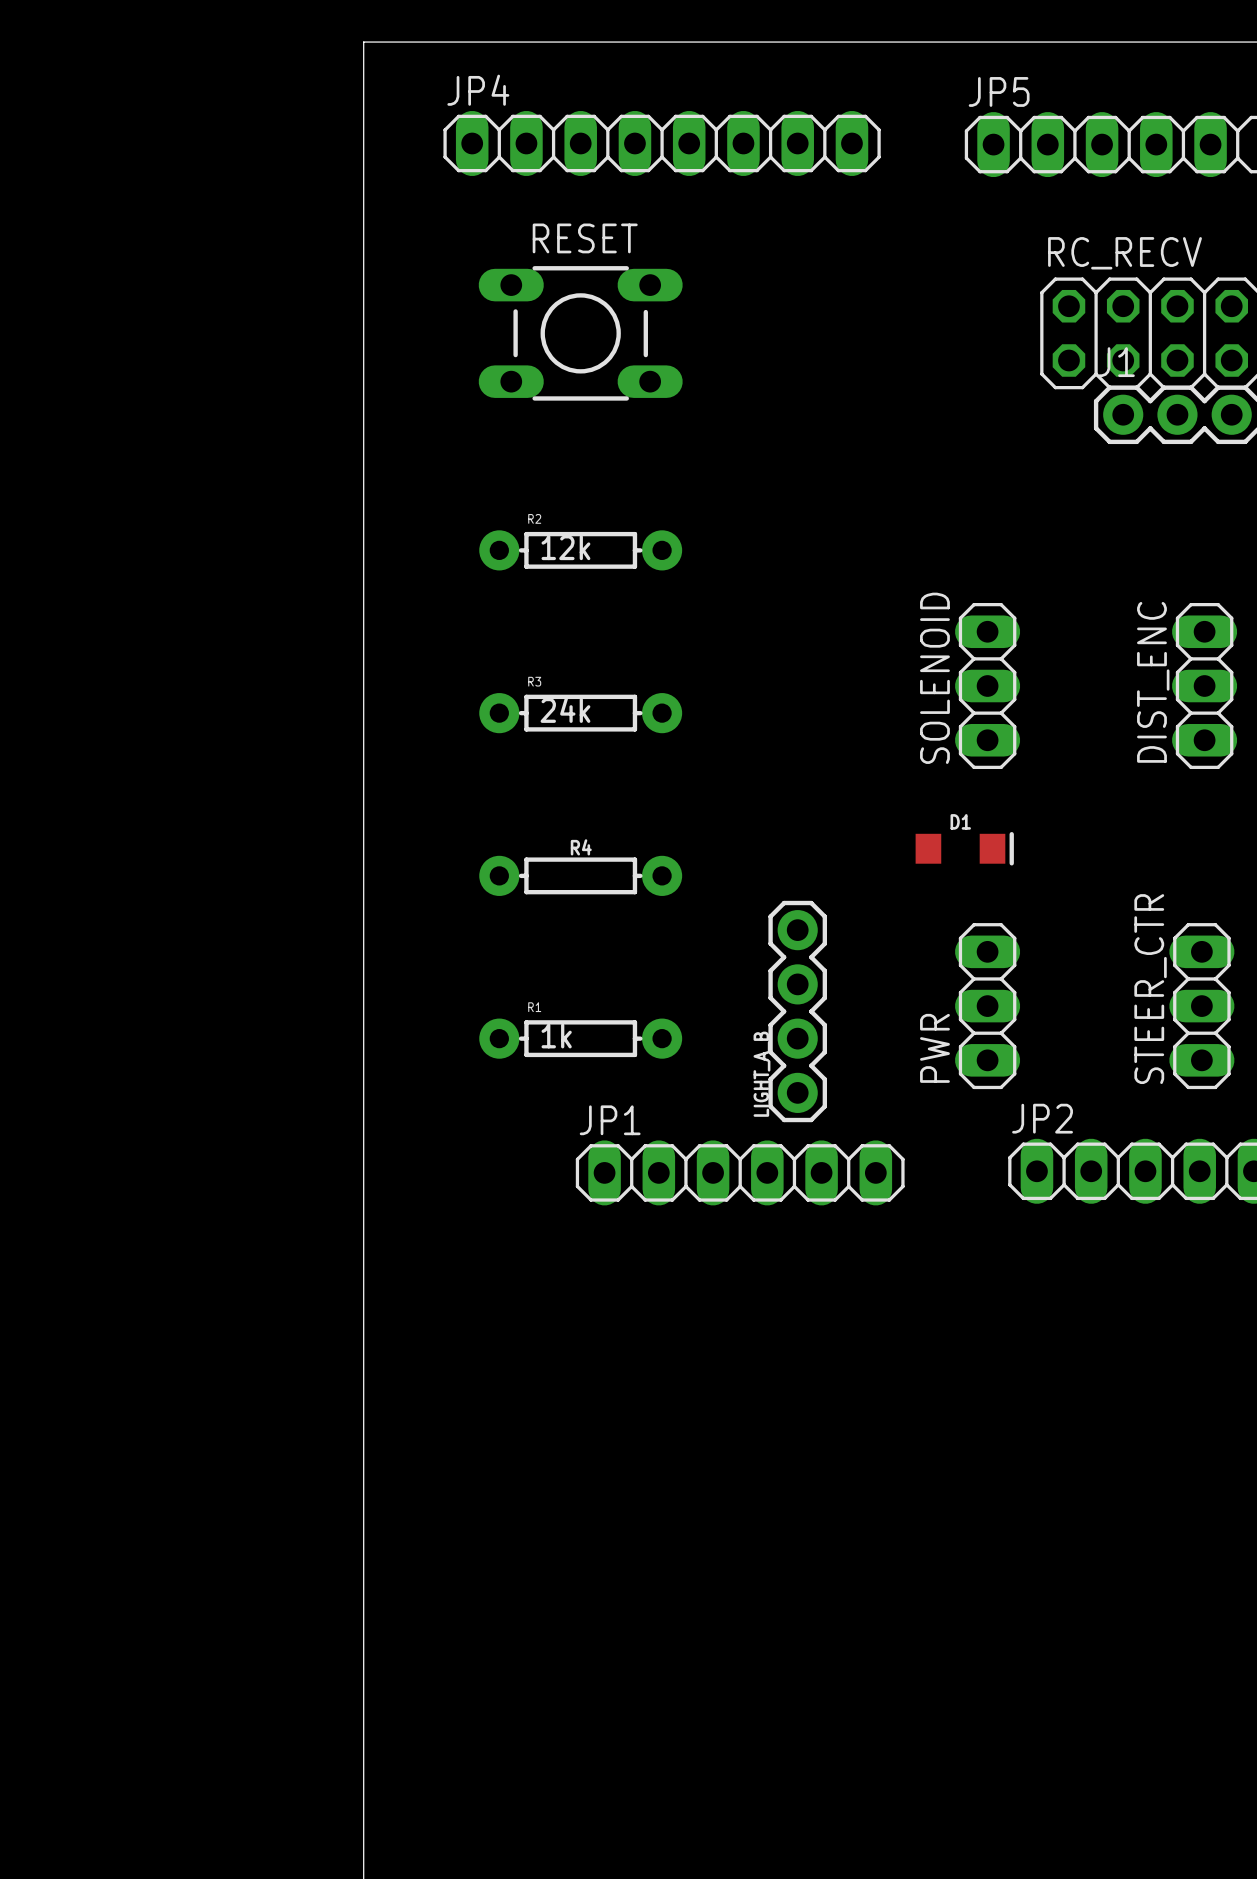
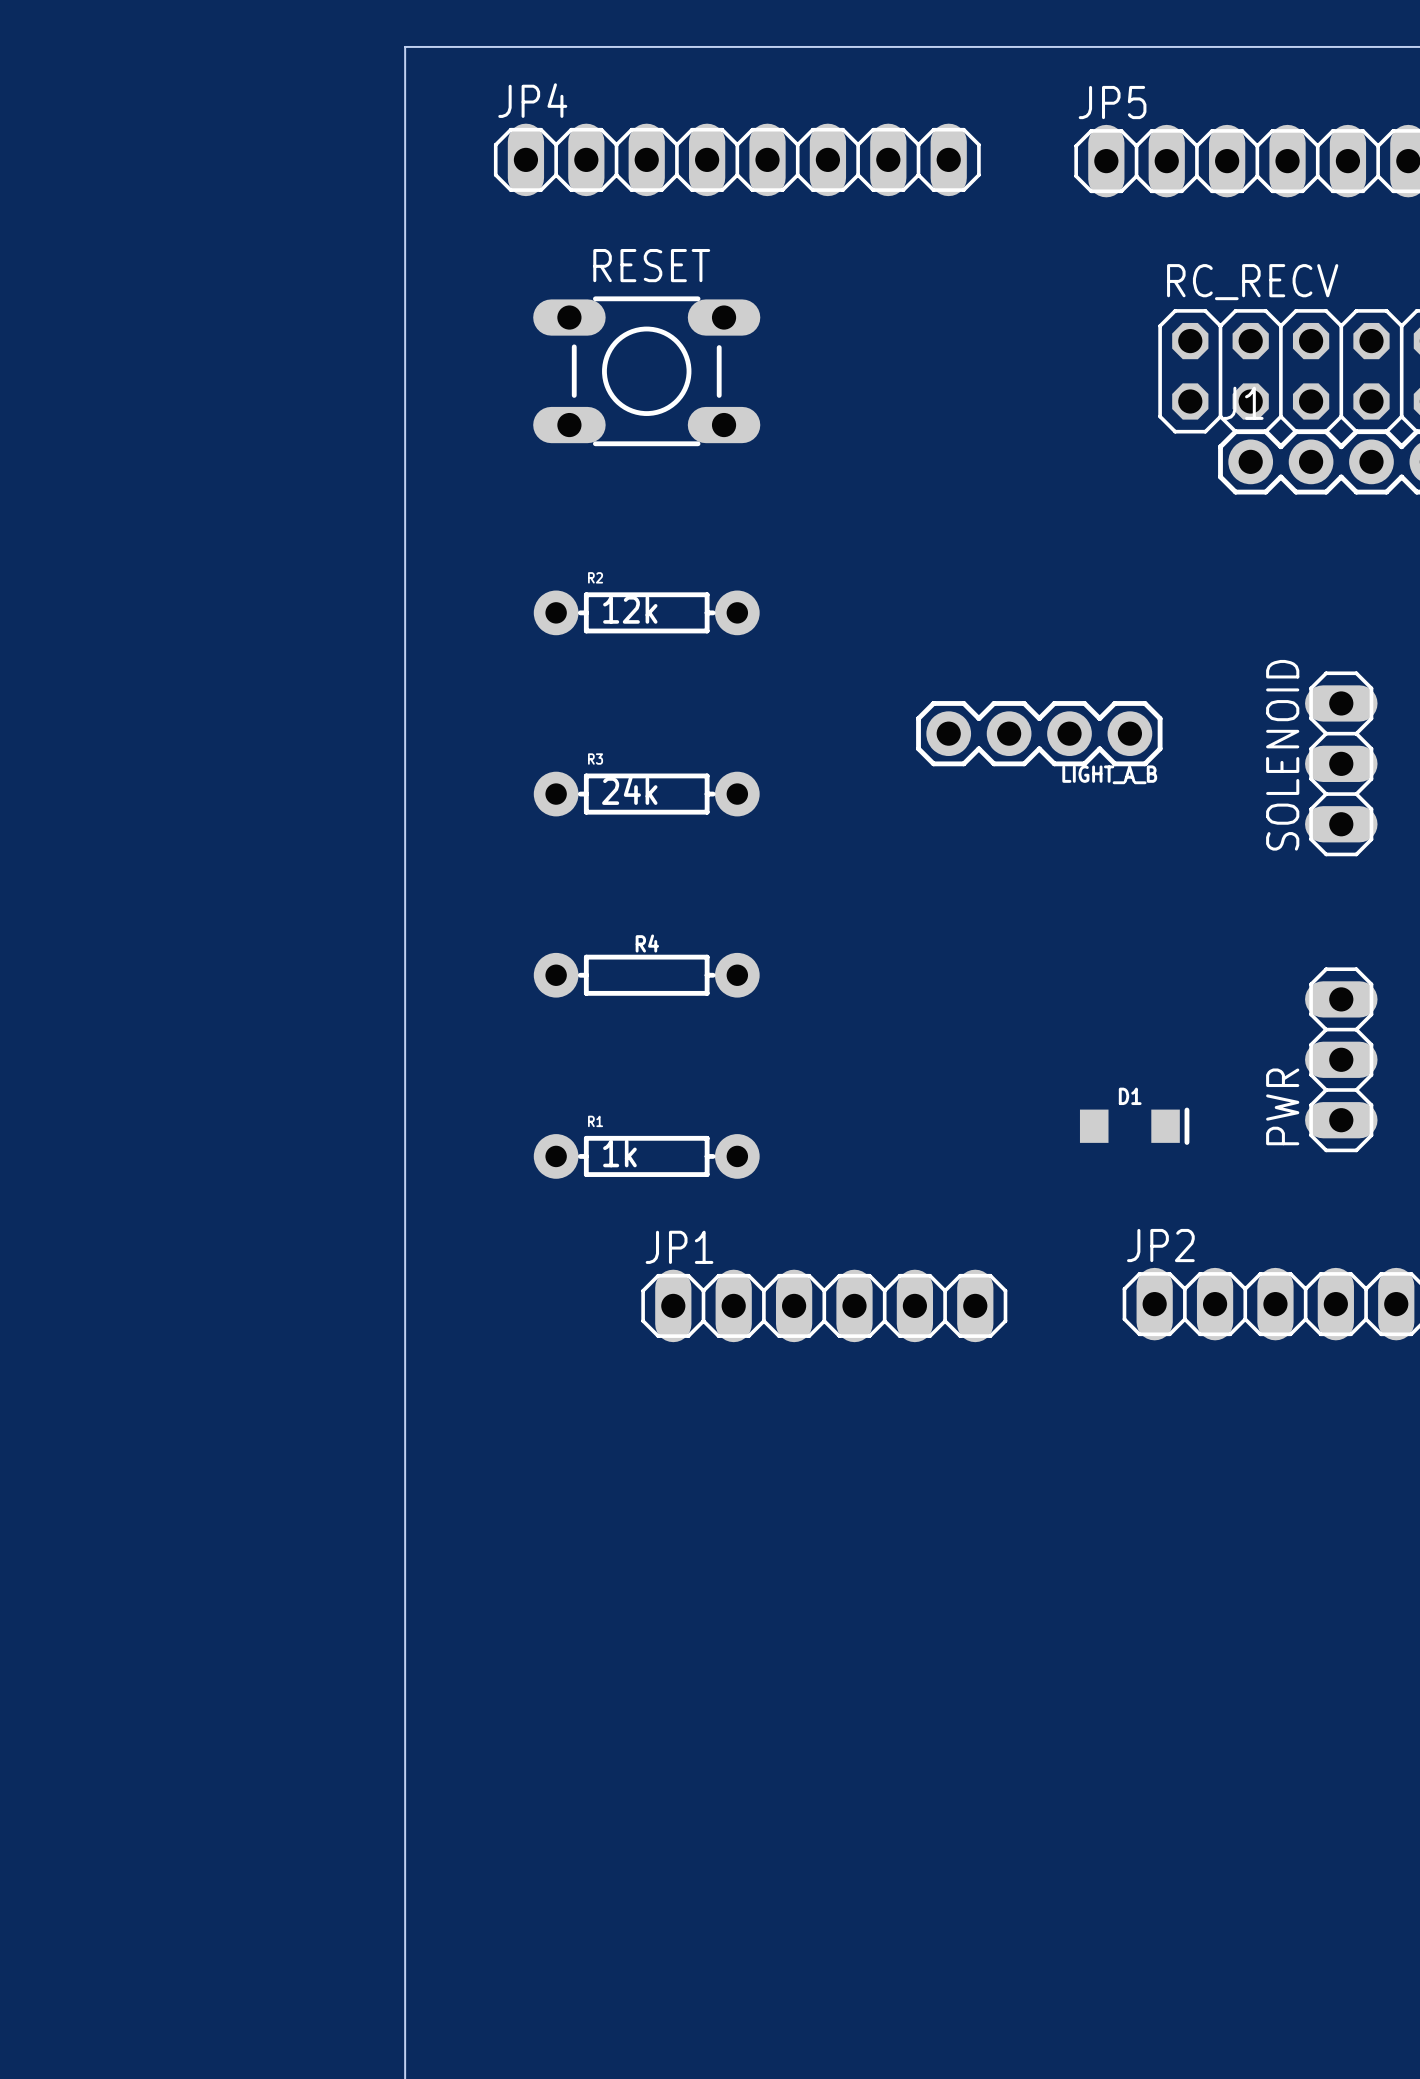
DIST_ENC name: DIST_ENC (1153, 682) -> SOLENOID (1282, 755)
SOLENOID: (987, 686) -> none
D1 position: (964, 848) -> (1134, 1126)
PWR position: (987, 1006) -> (1341, 1059)
STEER_CTR: (1201, 1006) -> none
LIGHT_A_B rotation: 0° (797, 1011) -> 90° clockwise (1039, 733)
LIGHT_A_B position: (797, 1011) -> (1039, 733)
LIGHT_A_B name position: LIGHT_A_B (761, 1074) -> LIGHT_A_B (1109, 774)

